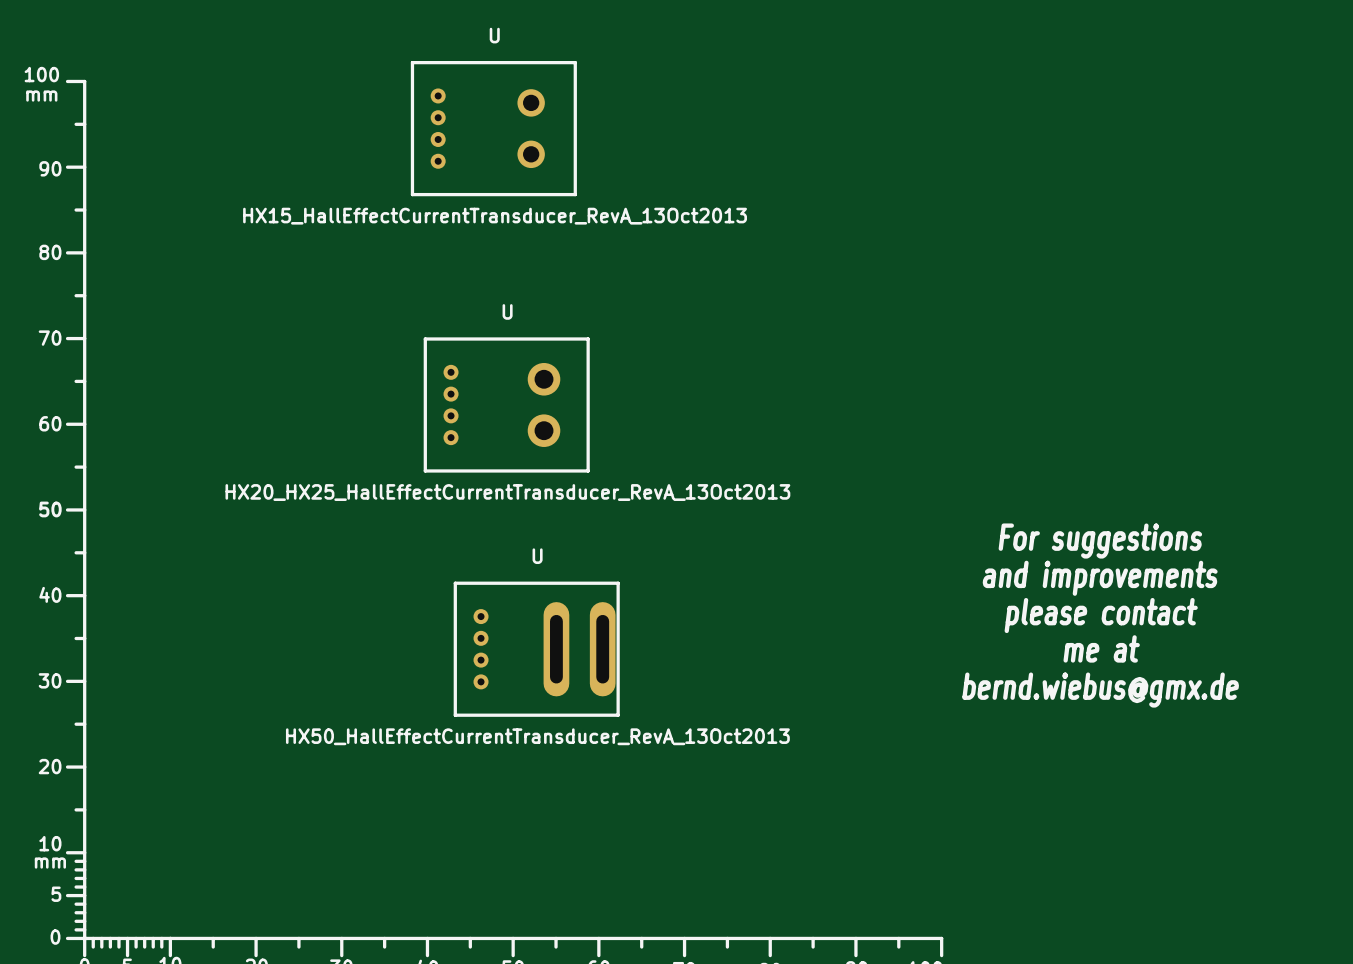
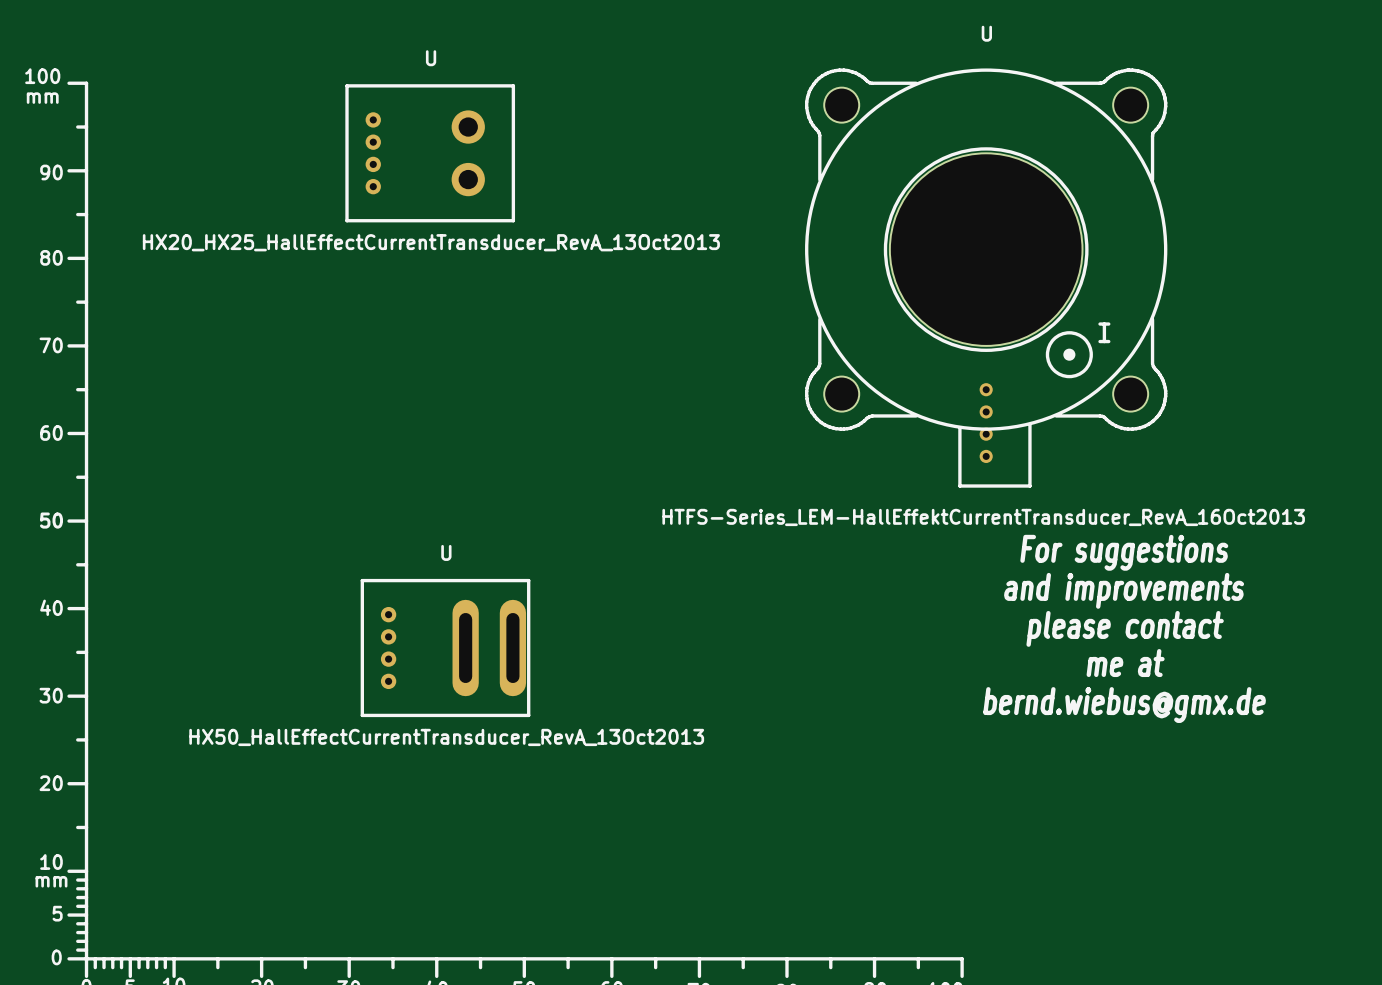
U: HX15_HallEffectCurrentTransducer_RevA_13Oct2013 (493, 128) -> none
U: none -> HX20_HX25_HallEffectCurrentTransducer_RevA_13Oct2013 (430, 153)
U: none -> HTFS-Series_LEM-HallEffektCurrentTransducer_RevA_16Oct2013 (986, 278)
U: HX20_HX25_HallEffectCurrentTransducer_RevA_13Oct2013 (506, 404) -> none
U position: (536, 649) -> (445, 648)

